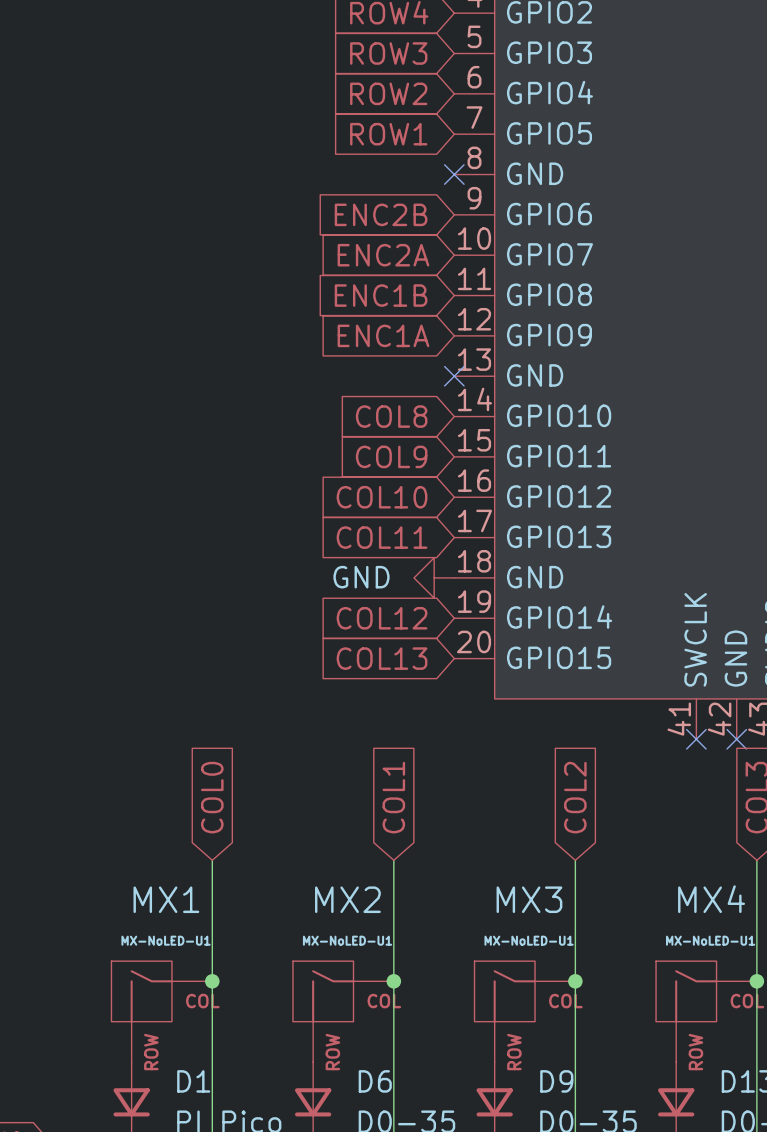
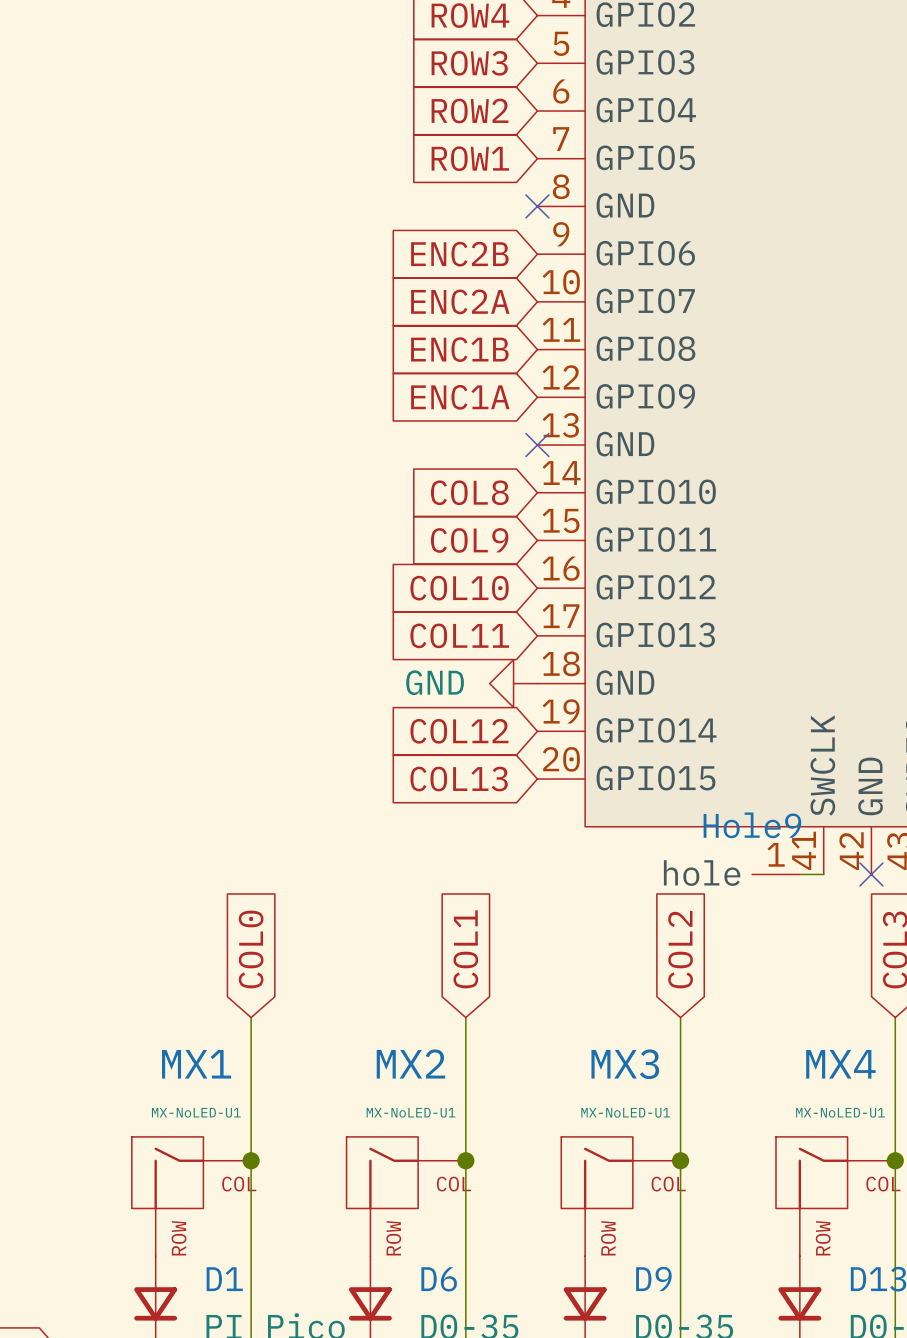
Hole9: none -> (775, 874)
wire: none -> (799, 874) (823, 874)
no-connect mark: (696, 739) -> none

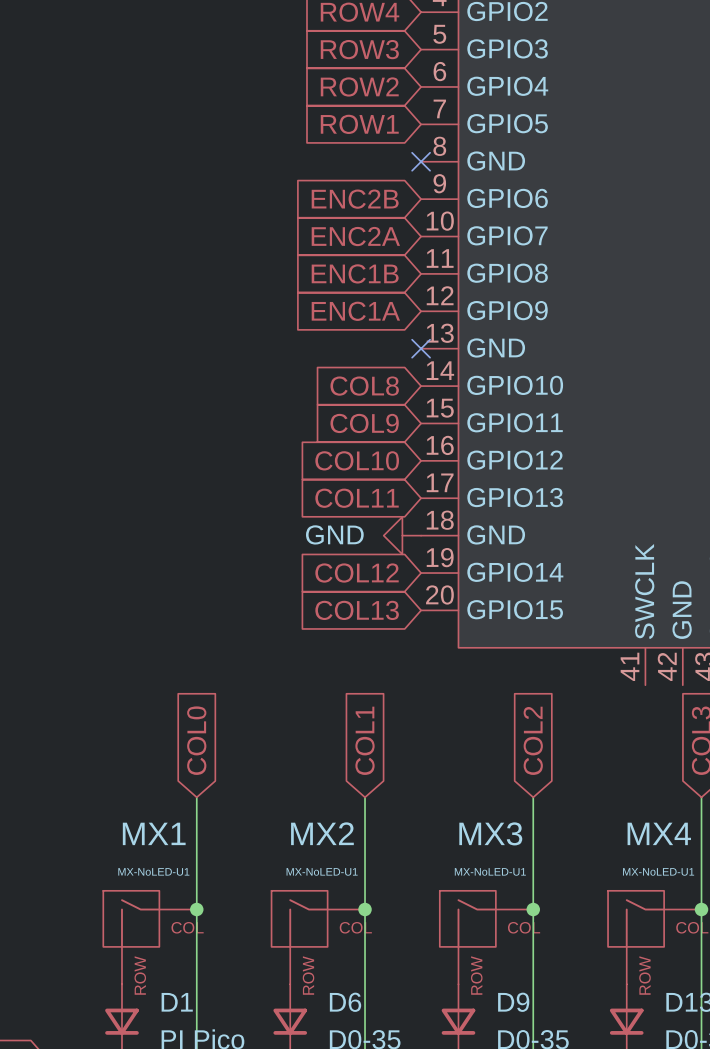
Hole9: (775, 874) -> none
wire: (799, 874) (823, 874) -> none
no-connect mark: (871, 874) -> none

